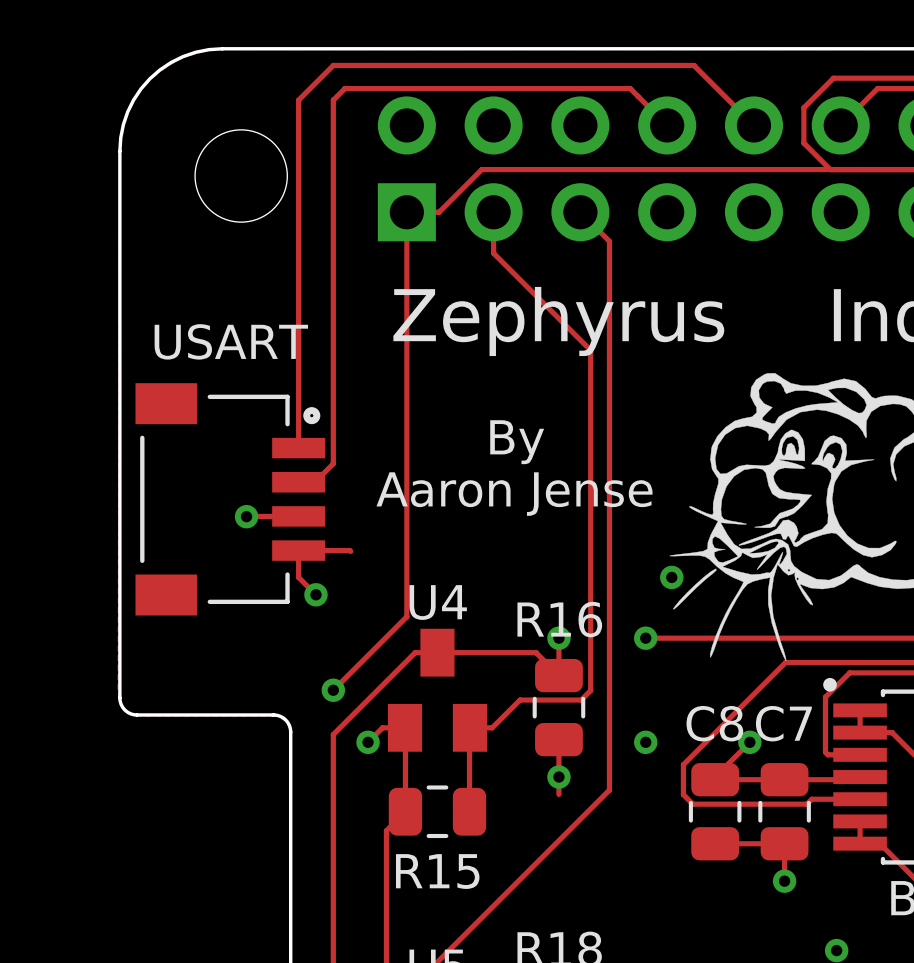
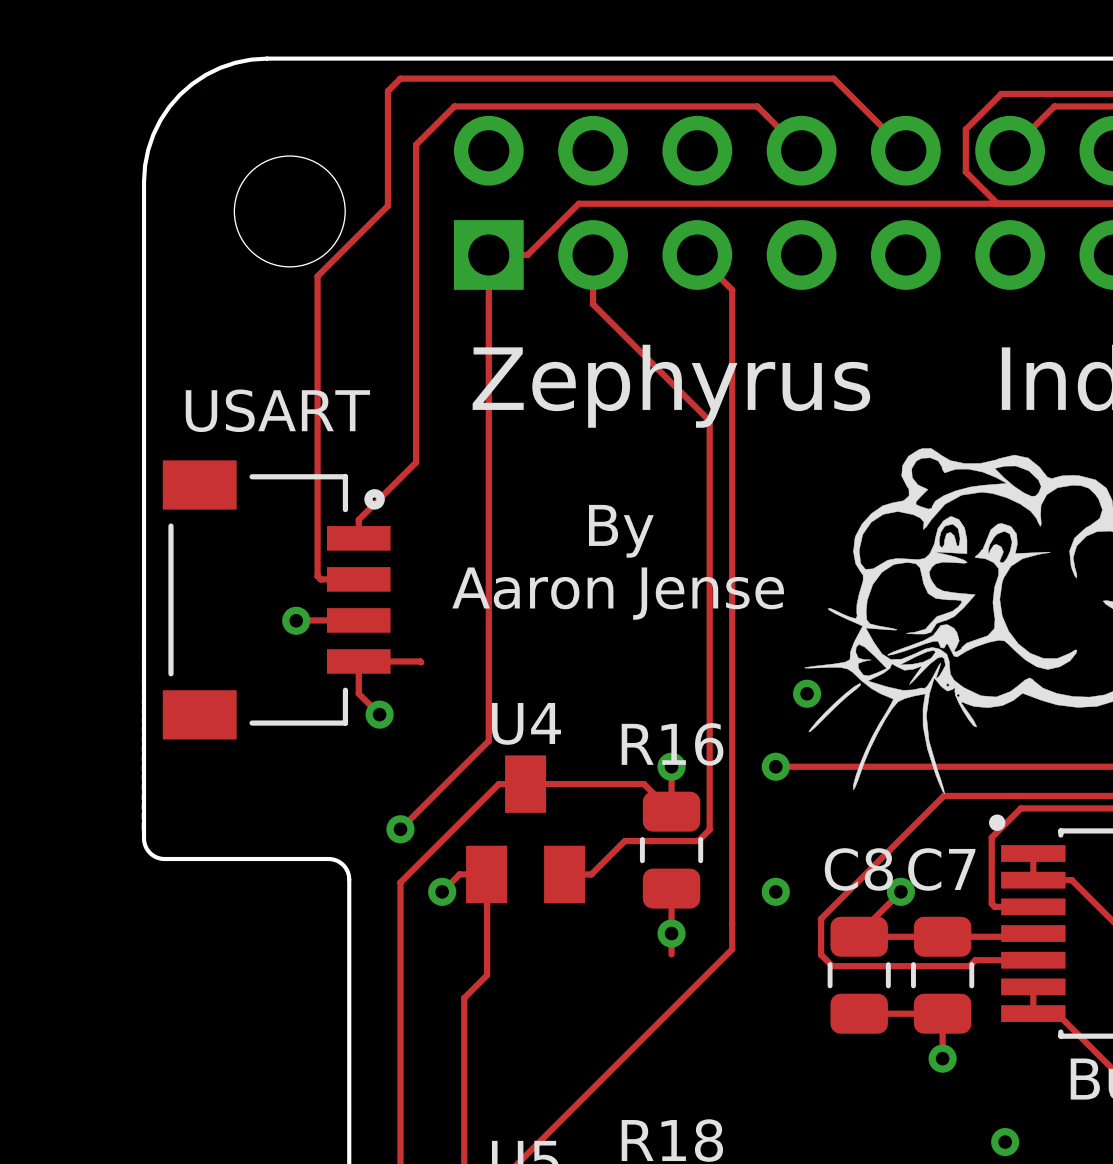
track: (322, 75) (298, 100) (298, 432) -> (387, 91) (387, 205) (317, 276) (317, 576) (320, 579) (358, 579)
track: (378, 88) (344, 88) (333, 100) (333, 463) (314, 482) -> (454, 106) (416, 144) (416, 462) (358, 519)
track: (469, 728) (469, 811) (472, 814) -> none
R15: (437, 811) -> none

